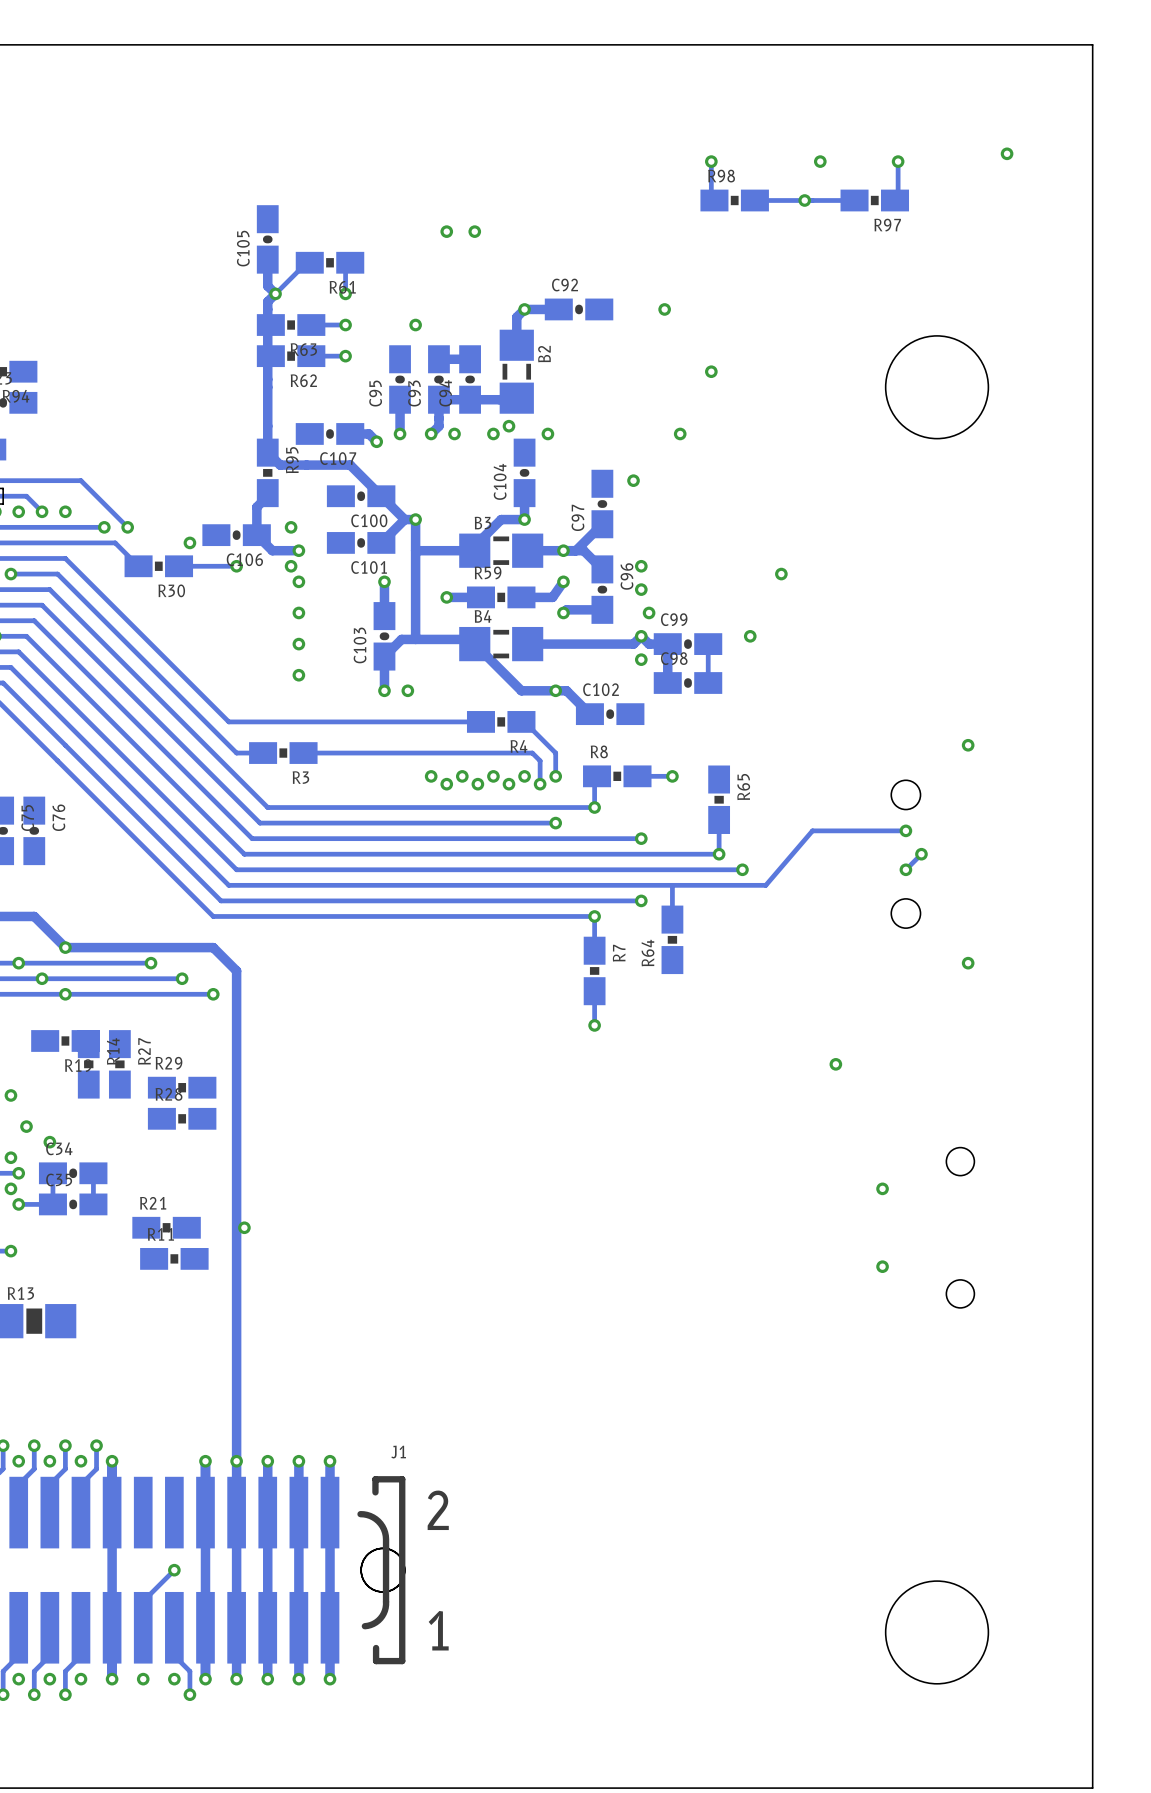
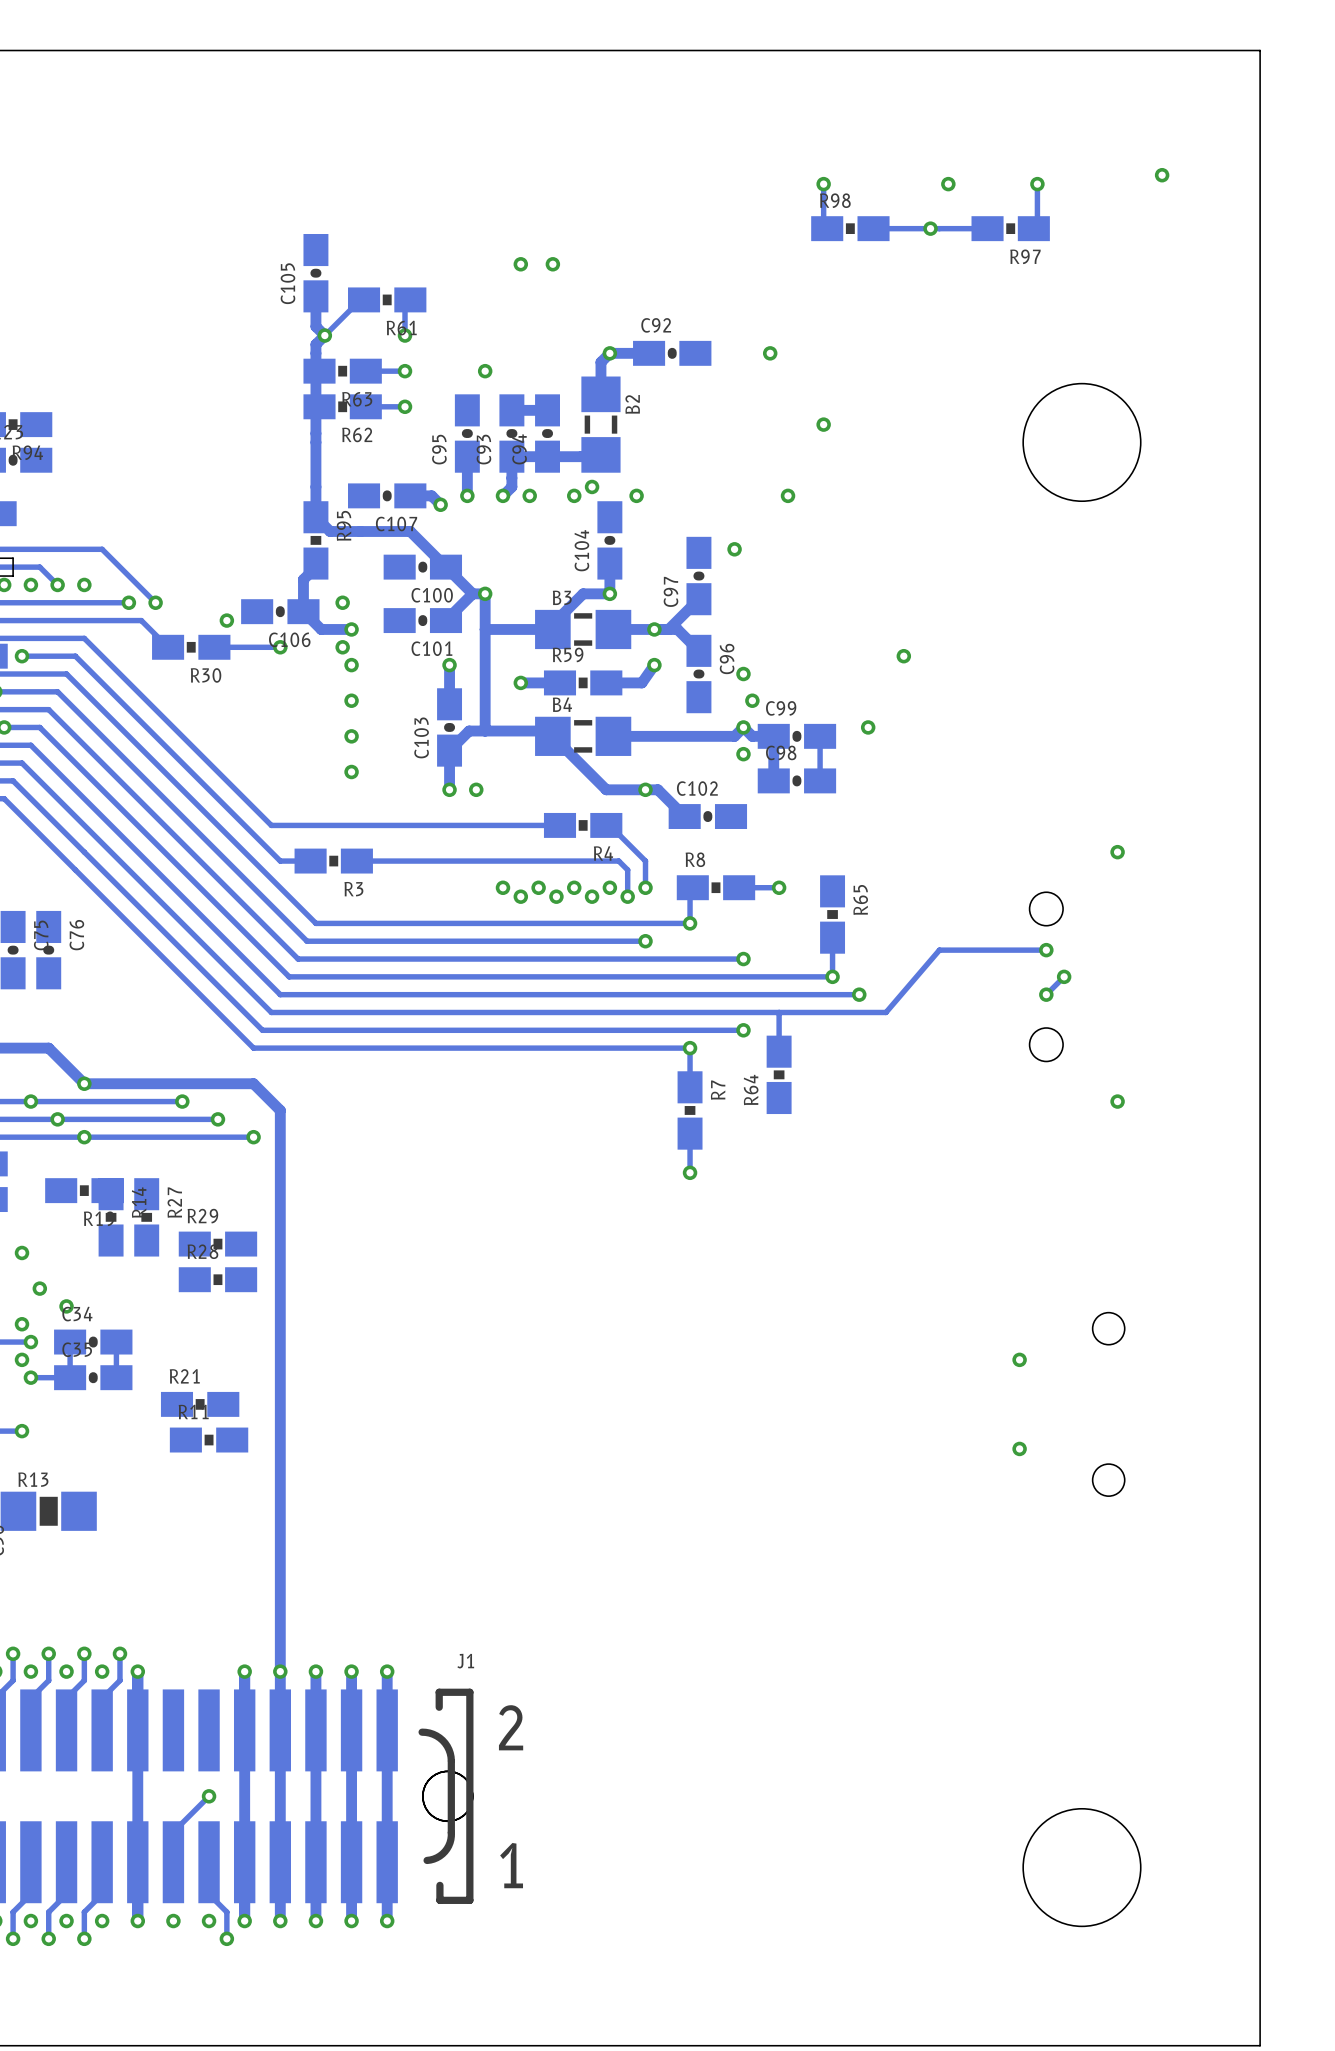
via: (641, 566) -> none
track: (602, 609) (566, 609) (563, 612) -> none
via: (563, 612) -> none
via: (835, 1064) -> none
via: (244, 1227) -> none

